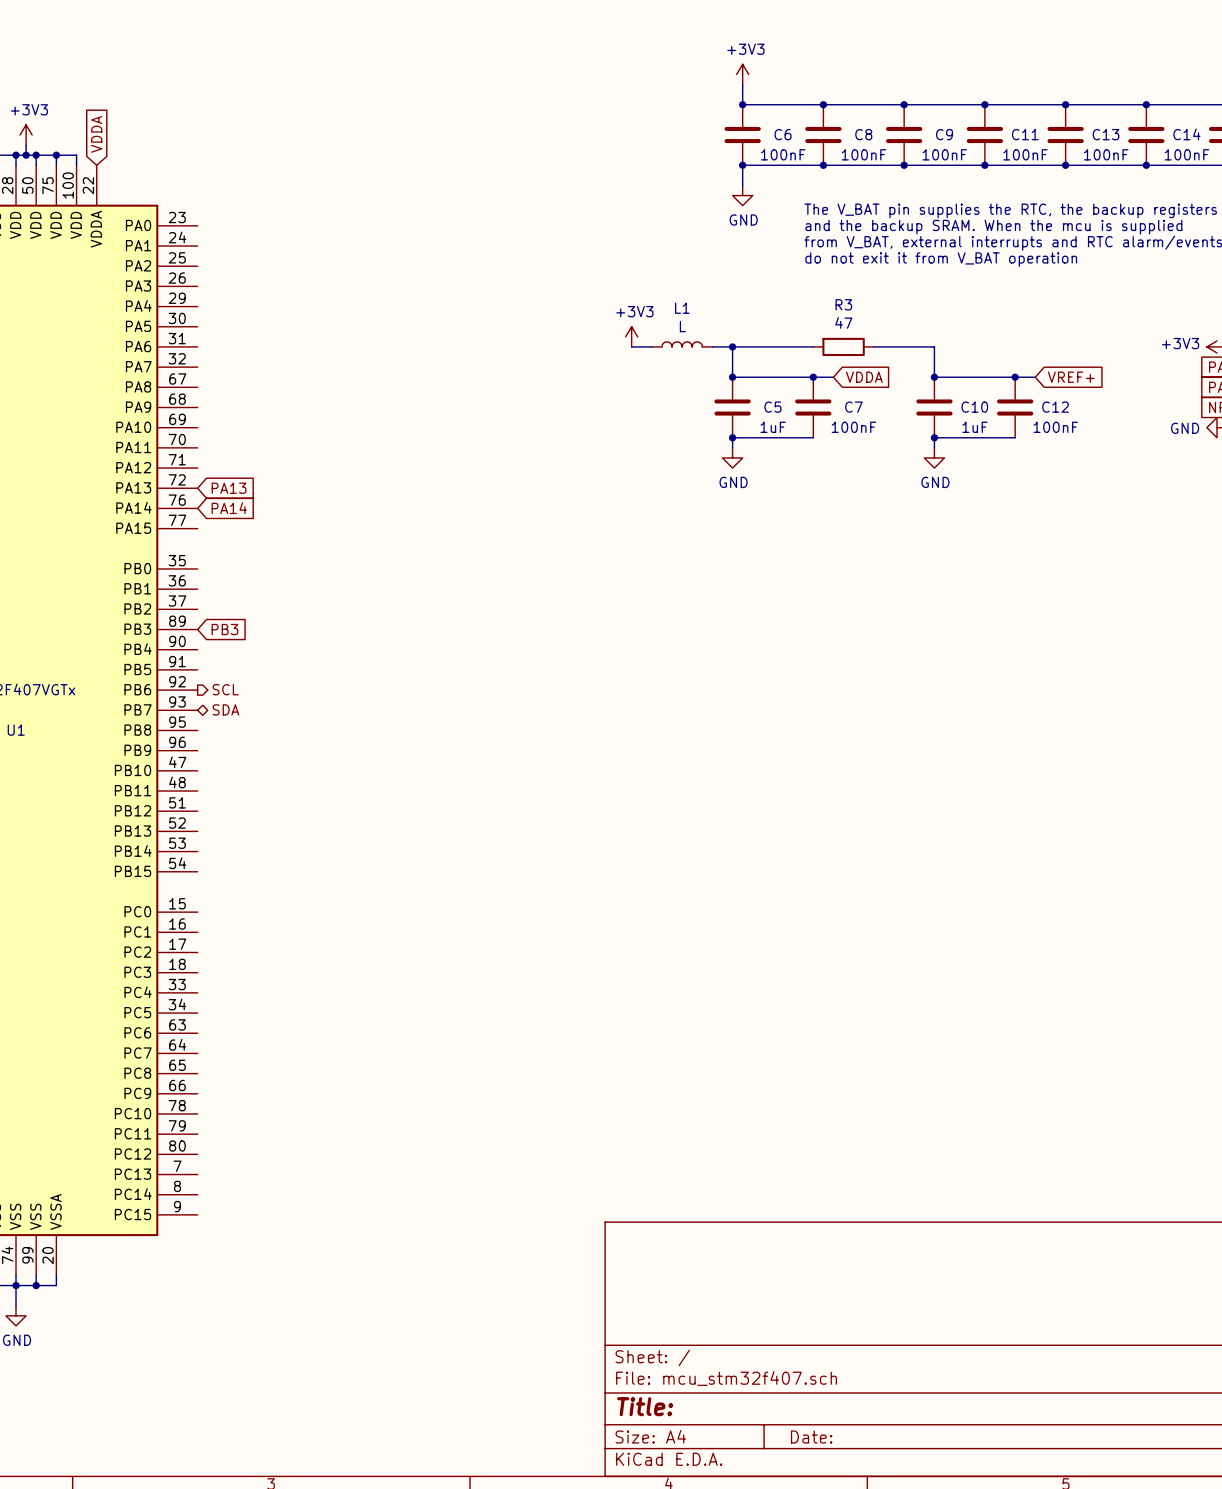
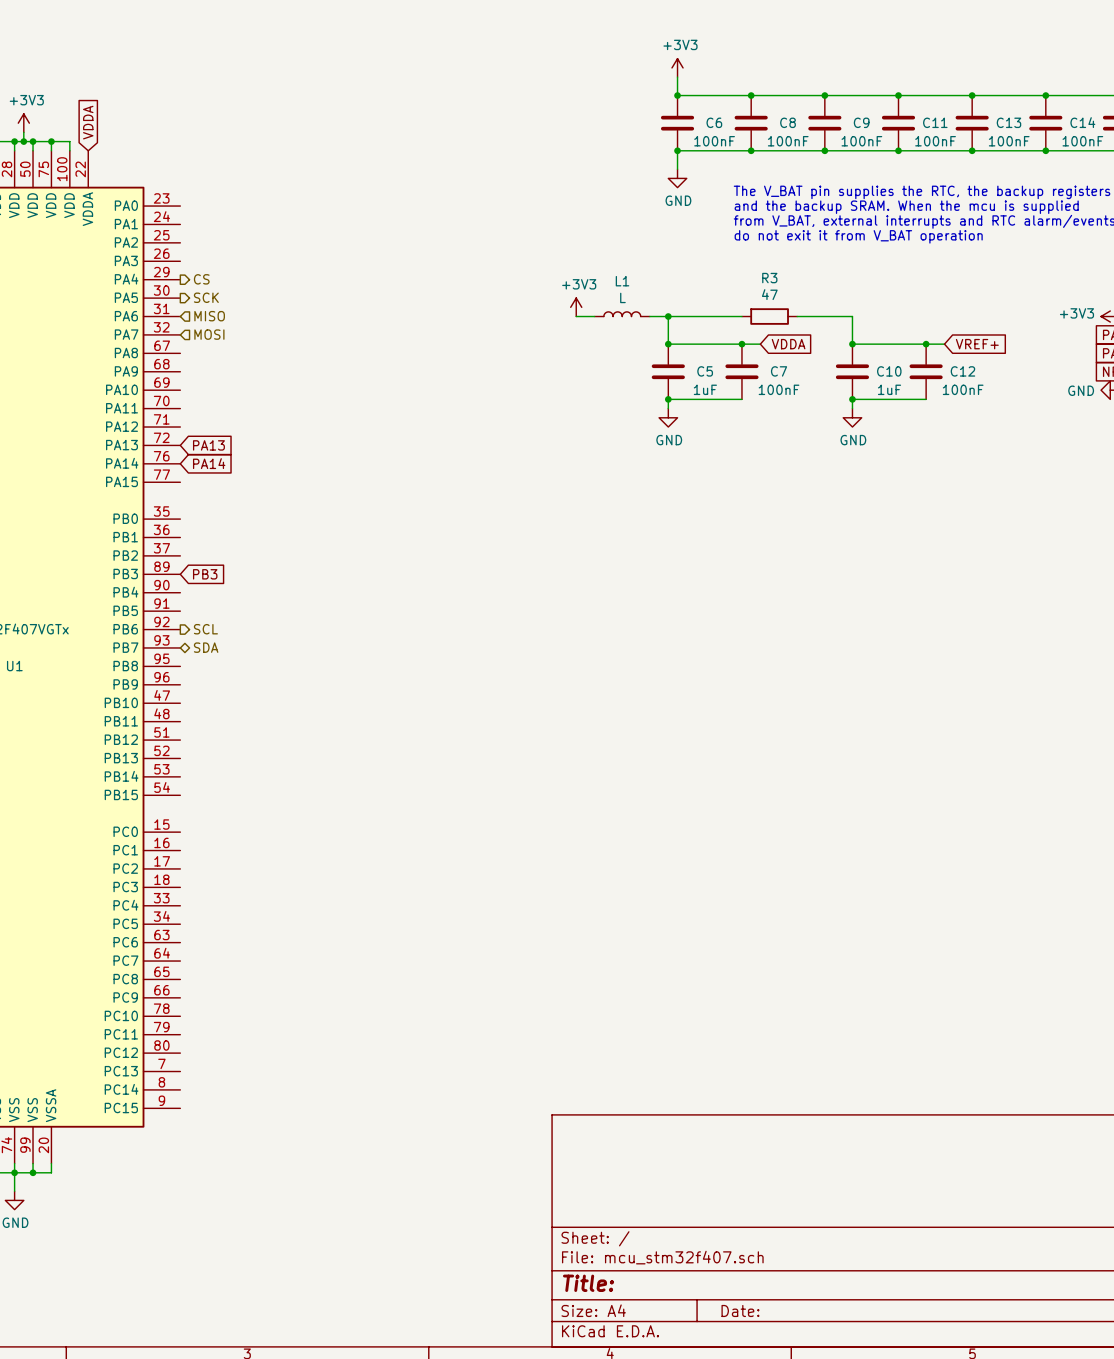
hierarchical label: none -> CS (201, 279)
hierarchical label: none -> SCK (206, 297)
hierarchical label: none -> MISO (209, 316)
hierarchical label: none -> MOSI (209, 334)

